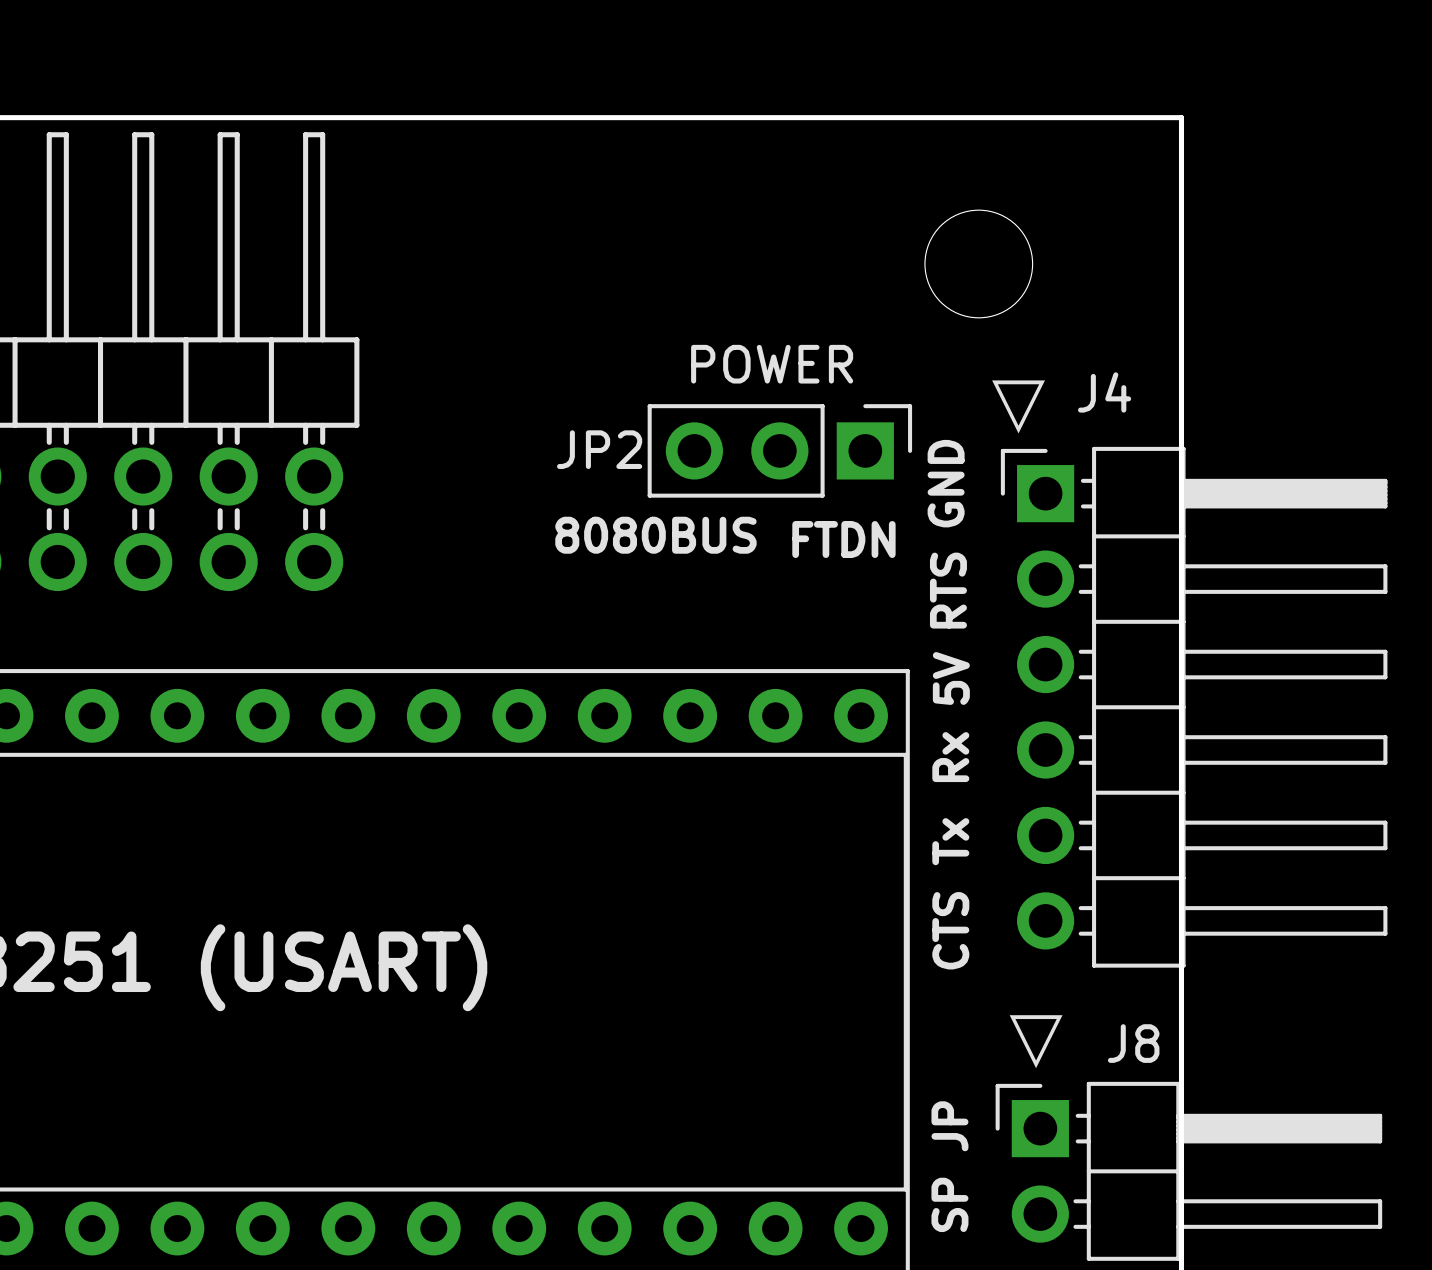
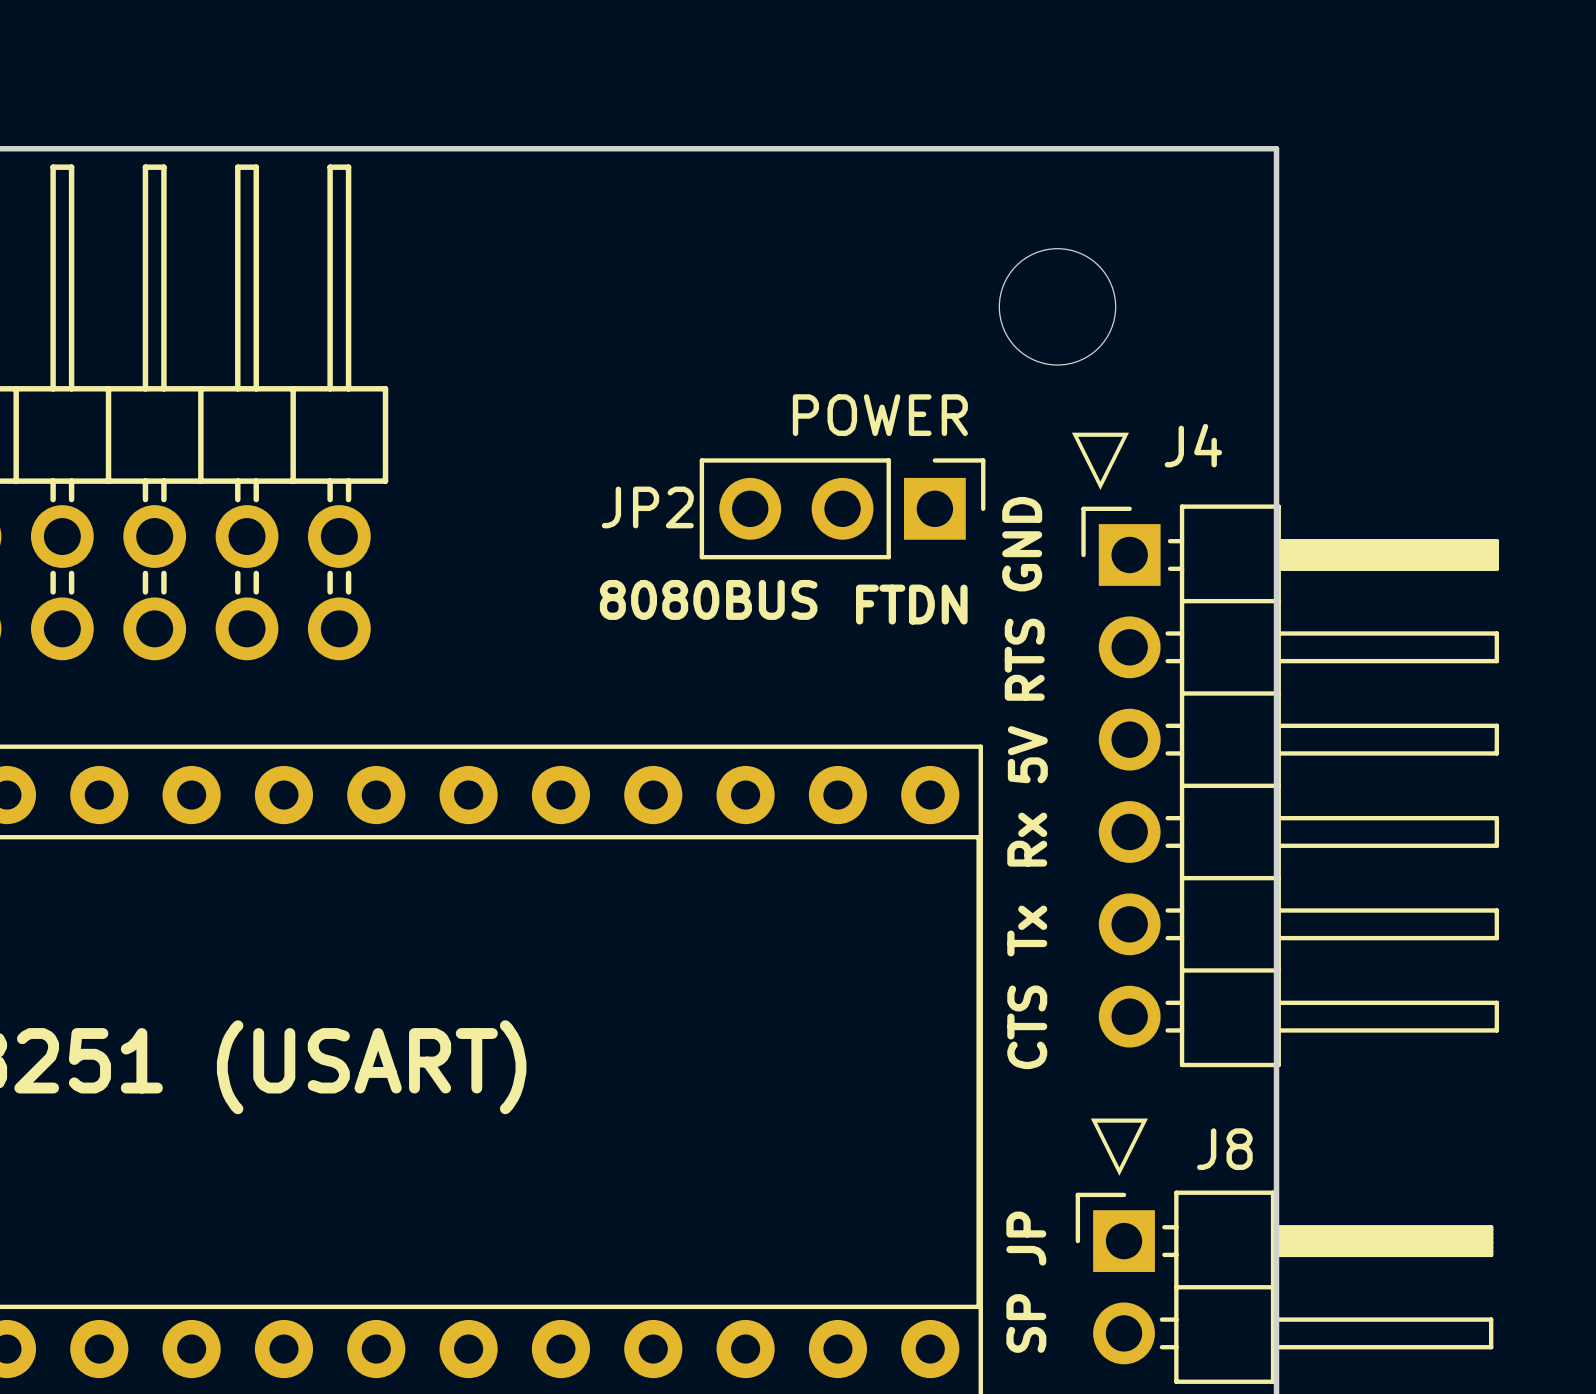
text position: POWER (772, 364) -> POWER (880, 415)

